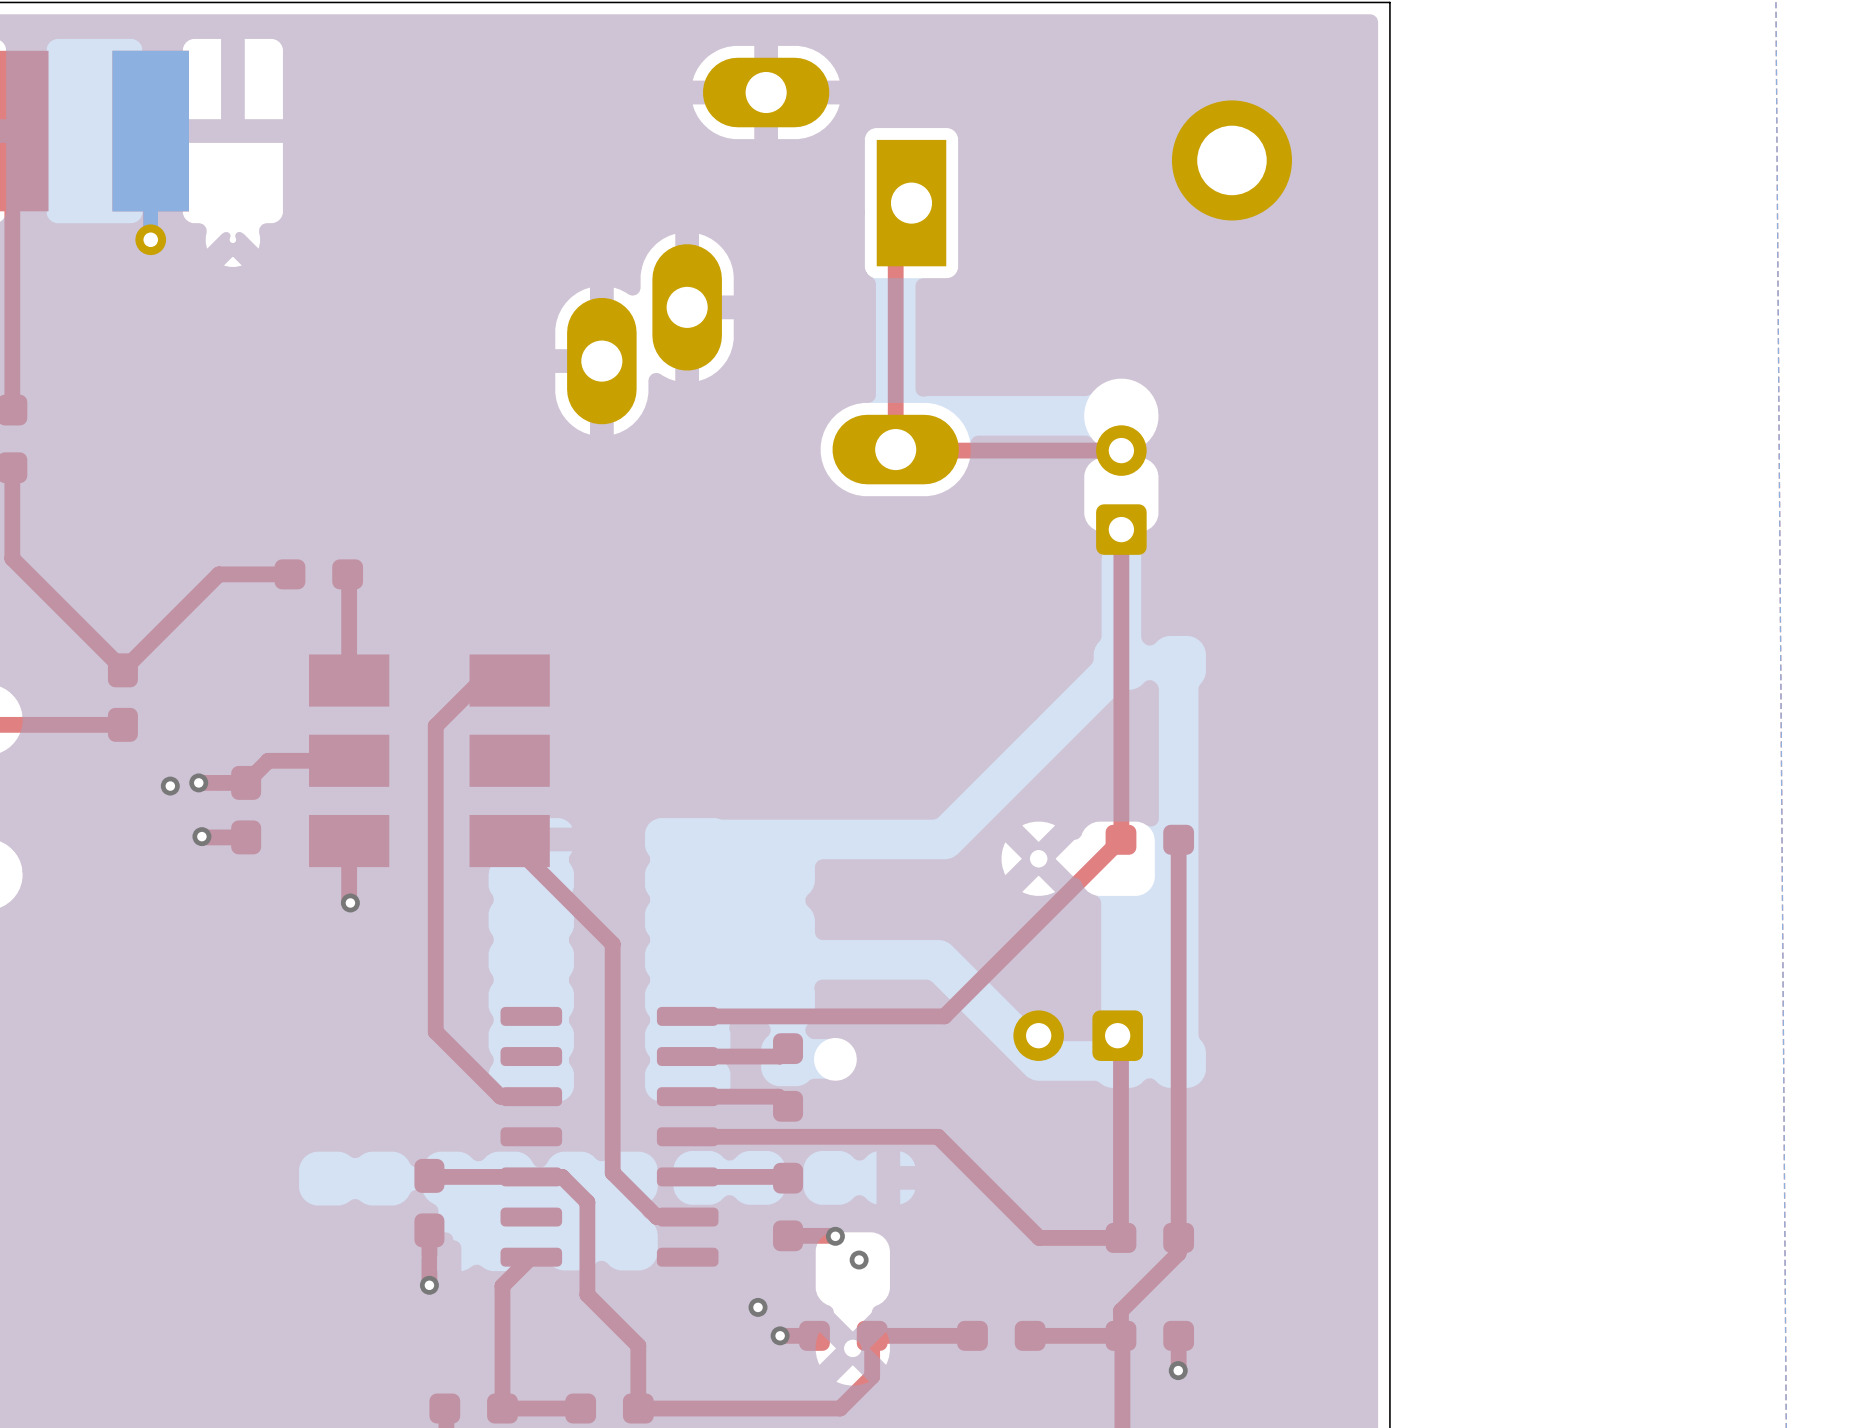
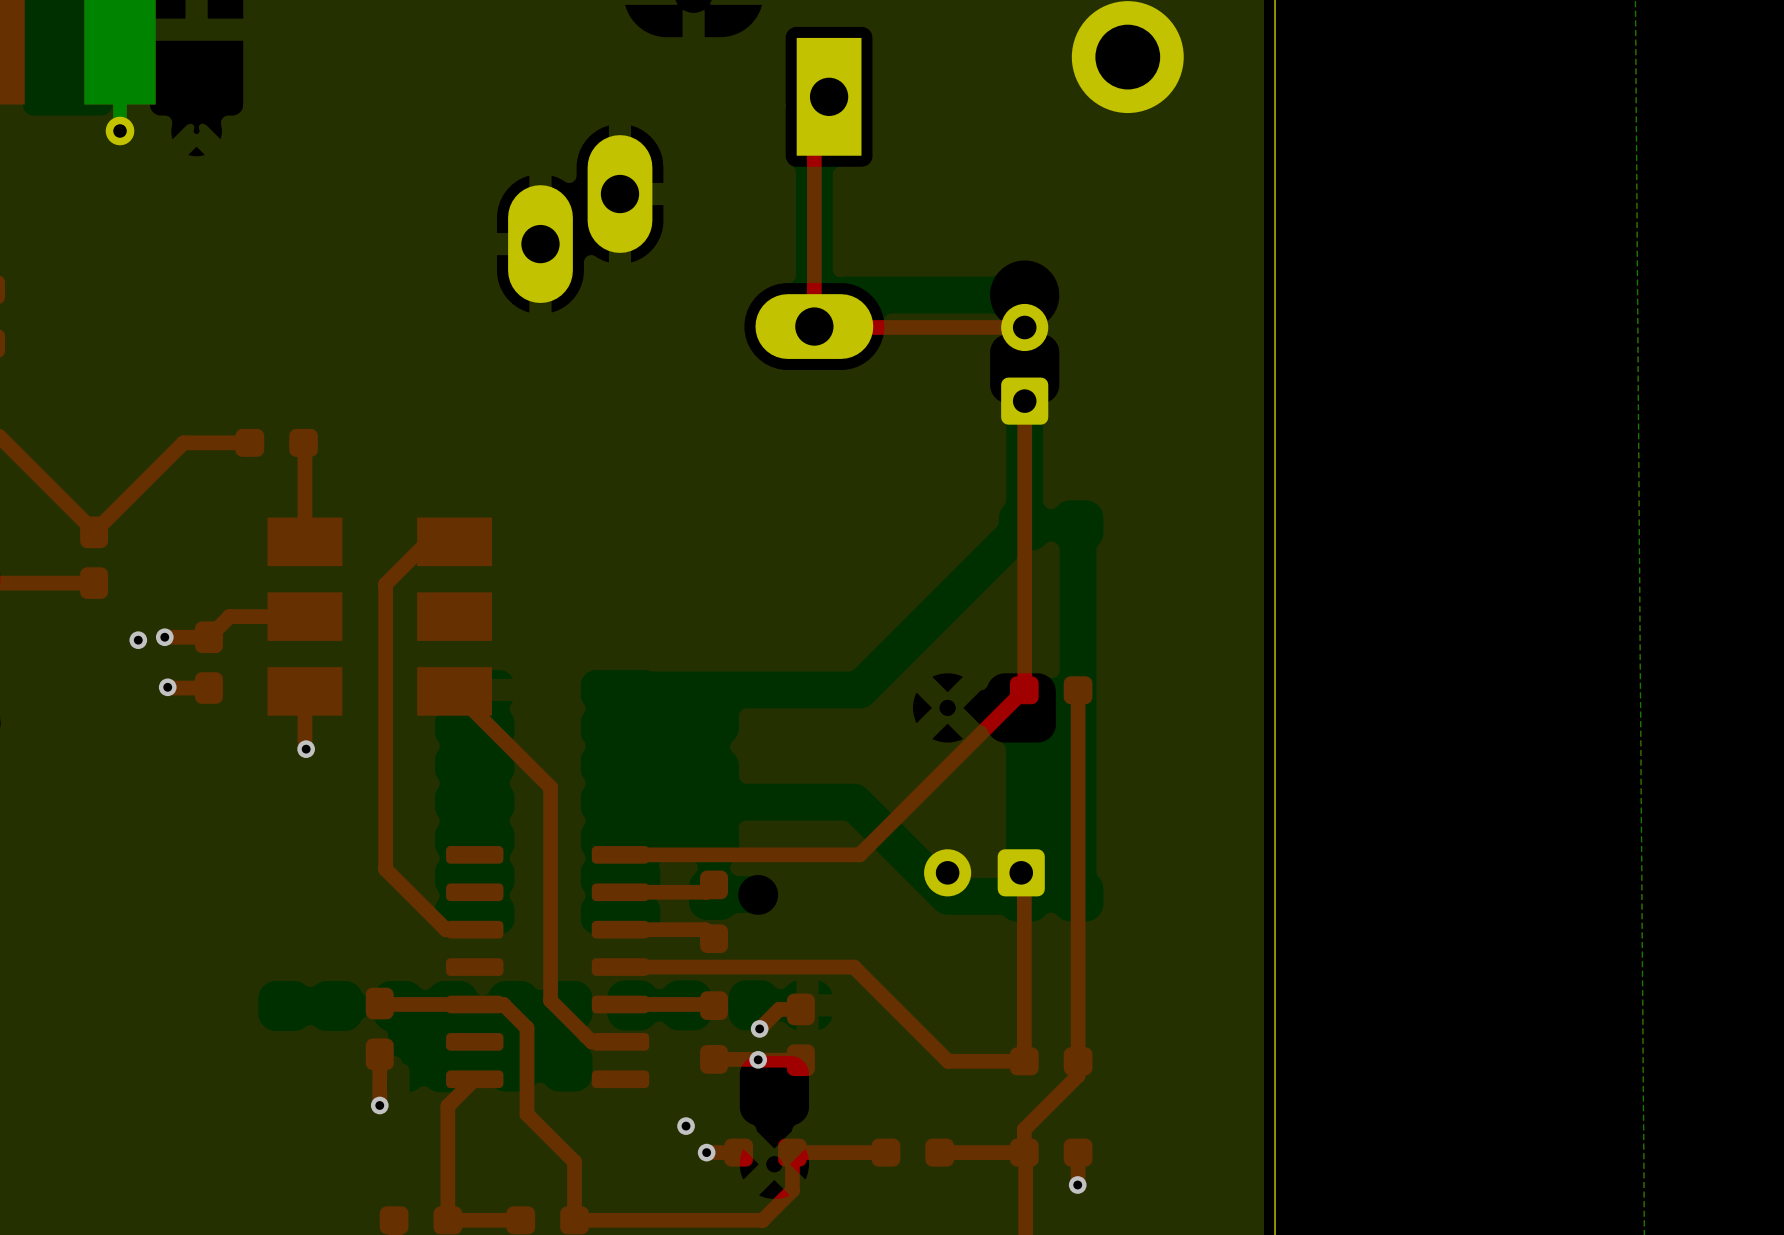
top track: none -> (800, 1009) (779, 1009) (759, 1028)
part: none -> (800, 1034)
top track: none -> (800, 1060) (758, 1060)
via position: (859, 1260) -> (759, 1028)

